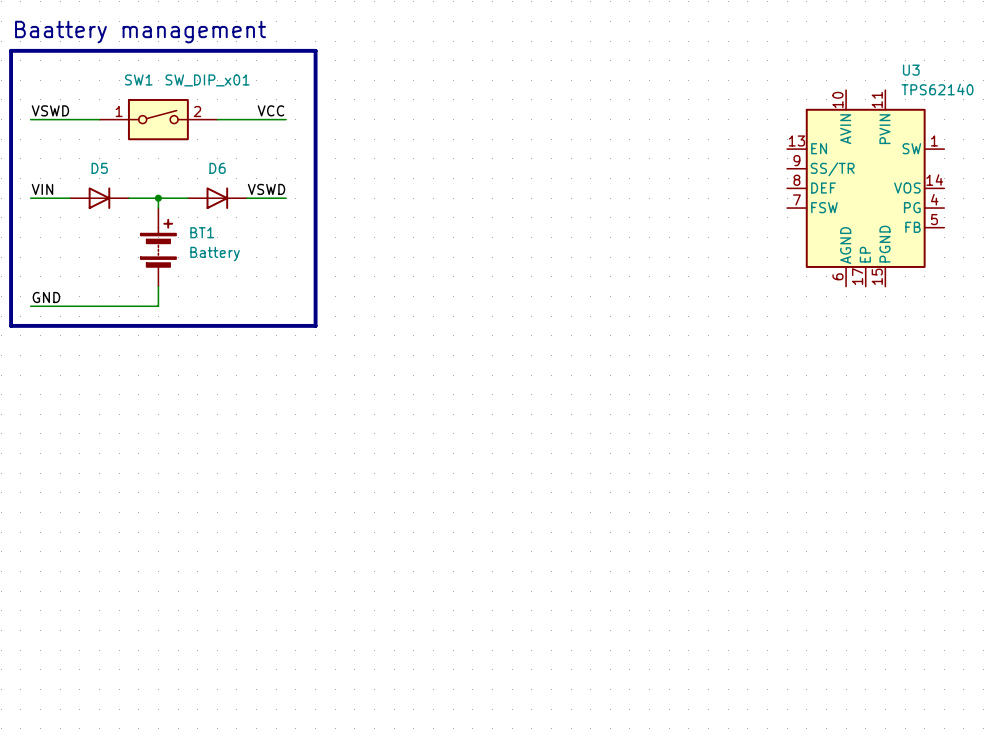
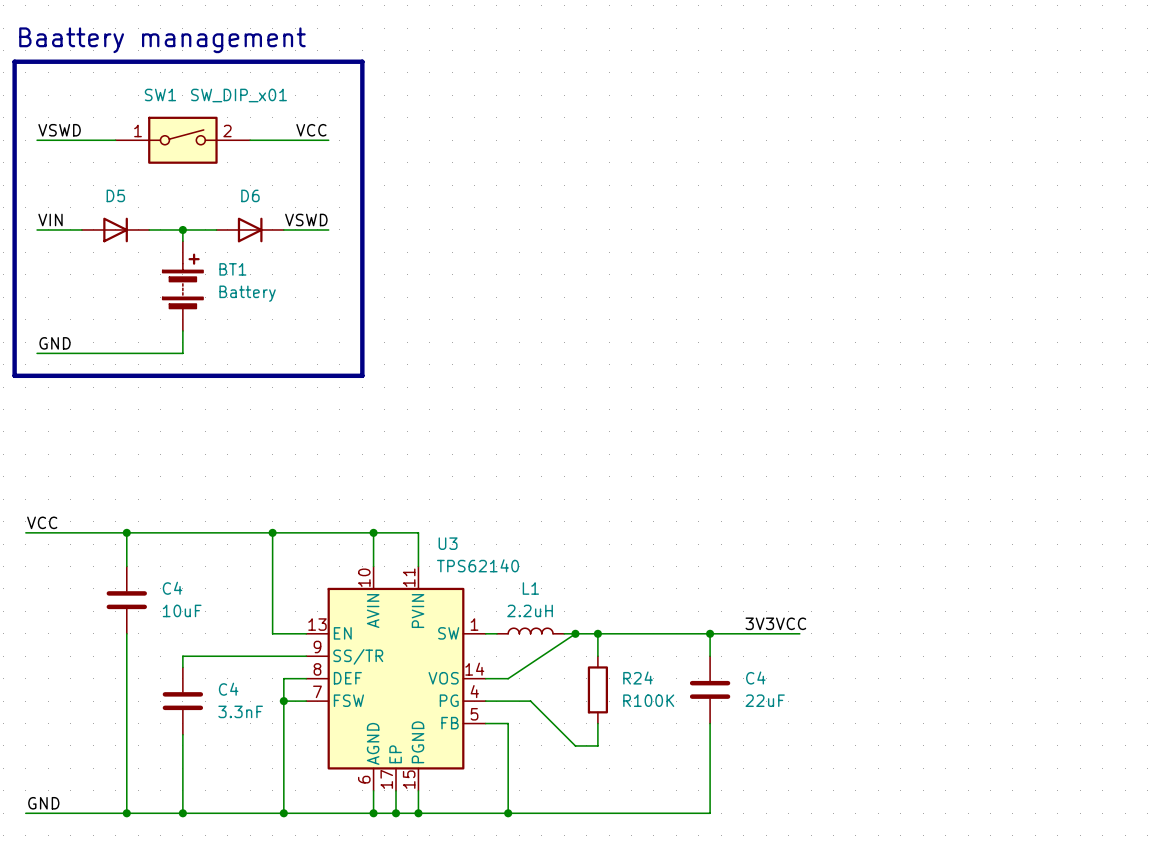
U3 position: (865, 188) -> (396, 678)
label: none -> VCC (42, 522)
wire: none -> (25, 532) (418, 532) (418, 566)
wire: none -> (126, 532) (126, 566)
junction: none -> (126, 532)
wire: none -> (272, 532) (272, 633) (306, 633)
junction: none -> (272, 532)
wire: none -> (373, 532) (373, 566)
junction: none -> (373, 532)
C4: none -> 10uF (126, 600)
label: none -> 3V3VCC (775, 623)
L1: none -> 2.2uH (530, 631)
wire: none -> (126, 633) (126, 813)
wire: none -> (485, 633) (496, 633)
wire: none -> (564, 633) (799, 633)
wire: none -> (575, 633) (508, 678) (485, 678)
junction: none -> (575, 633)
wire: none -> (597, 633) (597, 656)
junction: none -> (597, 633)
wire: none -> (710, 633) (710, 656)
junction: none -> (710, 633)
wire: none -> (306, 656) (182, 656) (182, 667)
wire: none -> (306, 678) (283, 678) (283, 813)
R24: none -> R100K (597, 689)
C4: none -> 22uF (710, 689)
C4: none -> 3.3nF (182, 701)
wire: none -> (283, 701) (306, 701)
junction: none -> (283, 701)
wire: none -> (485, 701) (530, 701) (575, 745) (597, 745) (597, 723)
wire: none -> (485, 723) (508, 723) (508, 813)
wire: none -> (710, 723) (710, 813) (25, 813)
wire: none -> (182, 734) (182, 813)
wire: none -> (373, 790) (373, 813)
wire: none -> (396, 790) (396, 813)
wire: none -> (418, 790) (418, 813)
label: none -> GND (43, 803)
junction: none -> (126, 813)
junction: none -> (182, 813)
junction: none -> (283, 813)
junction: none -> (373, 813)
junction: none -> (396, 813)
junction: none -> (418, 813)
junction: none -> (508, 813)

